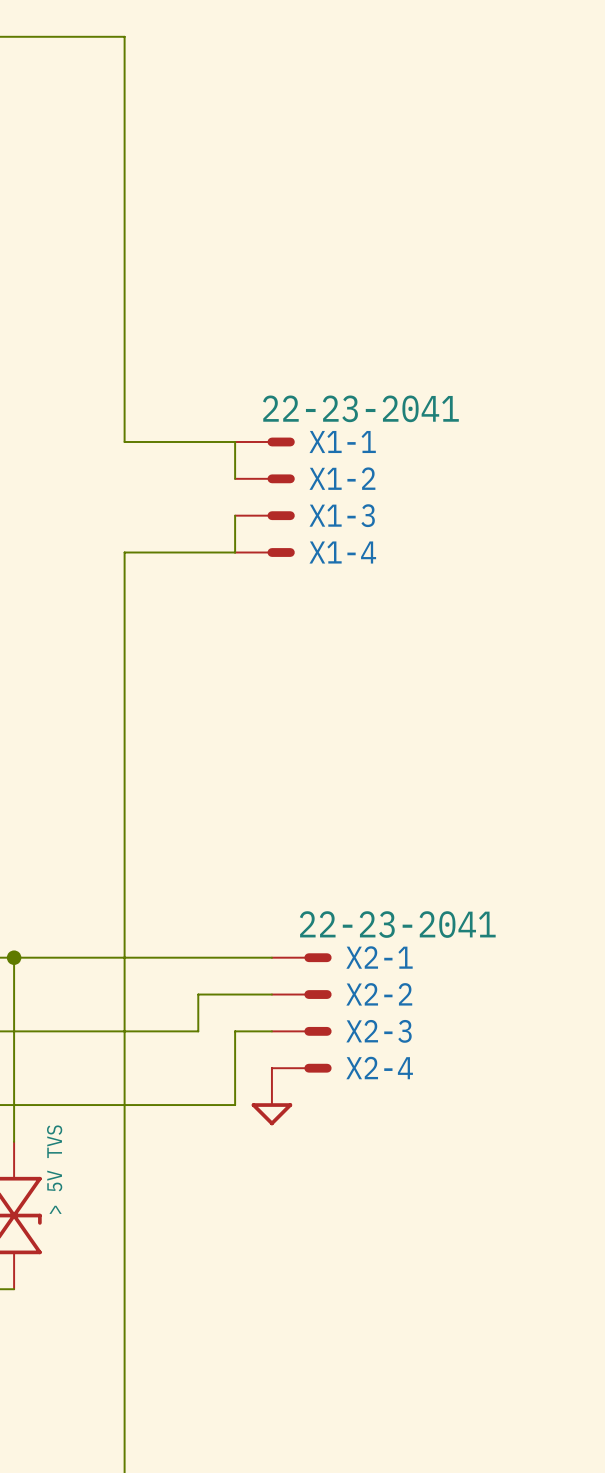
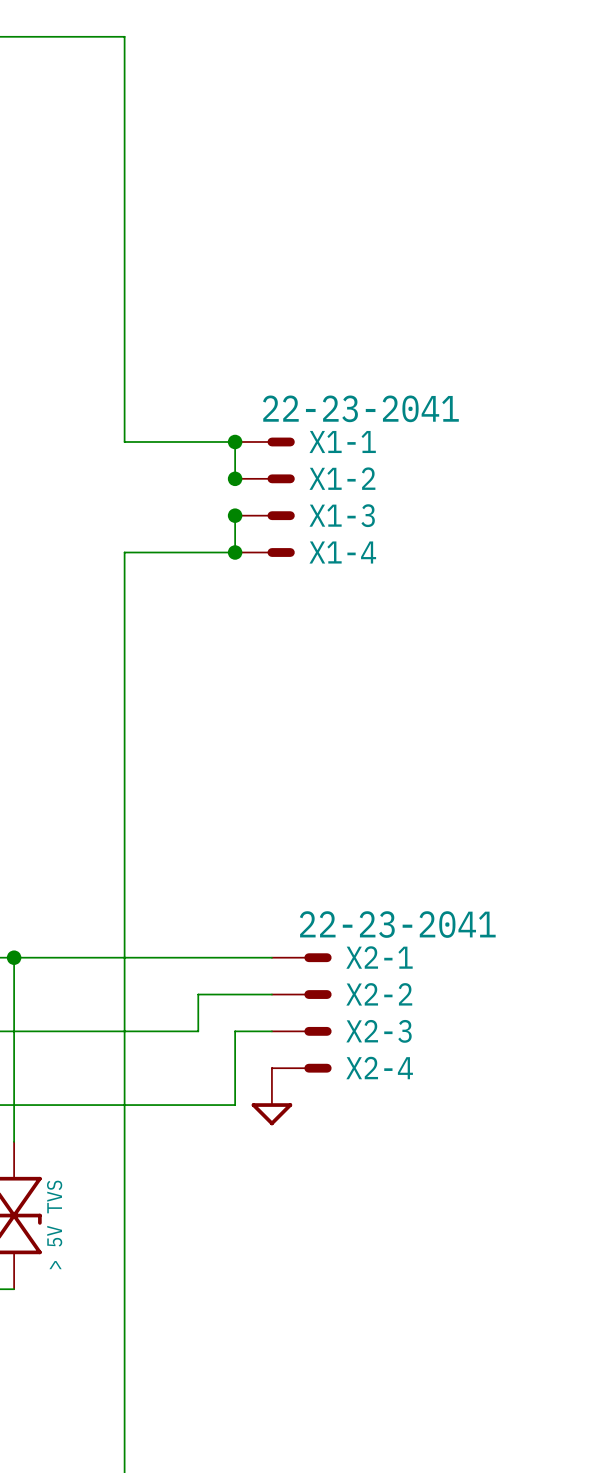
junction: none -> (235, 441)
junction: none -> (235, 478)
junction: none -> (235, 515)
junction: none -> (235, 552)
part value position: > 5V TVS (54, 1169) -> > 5V TVS (54, 1224)

